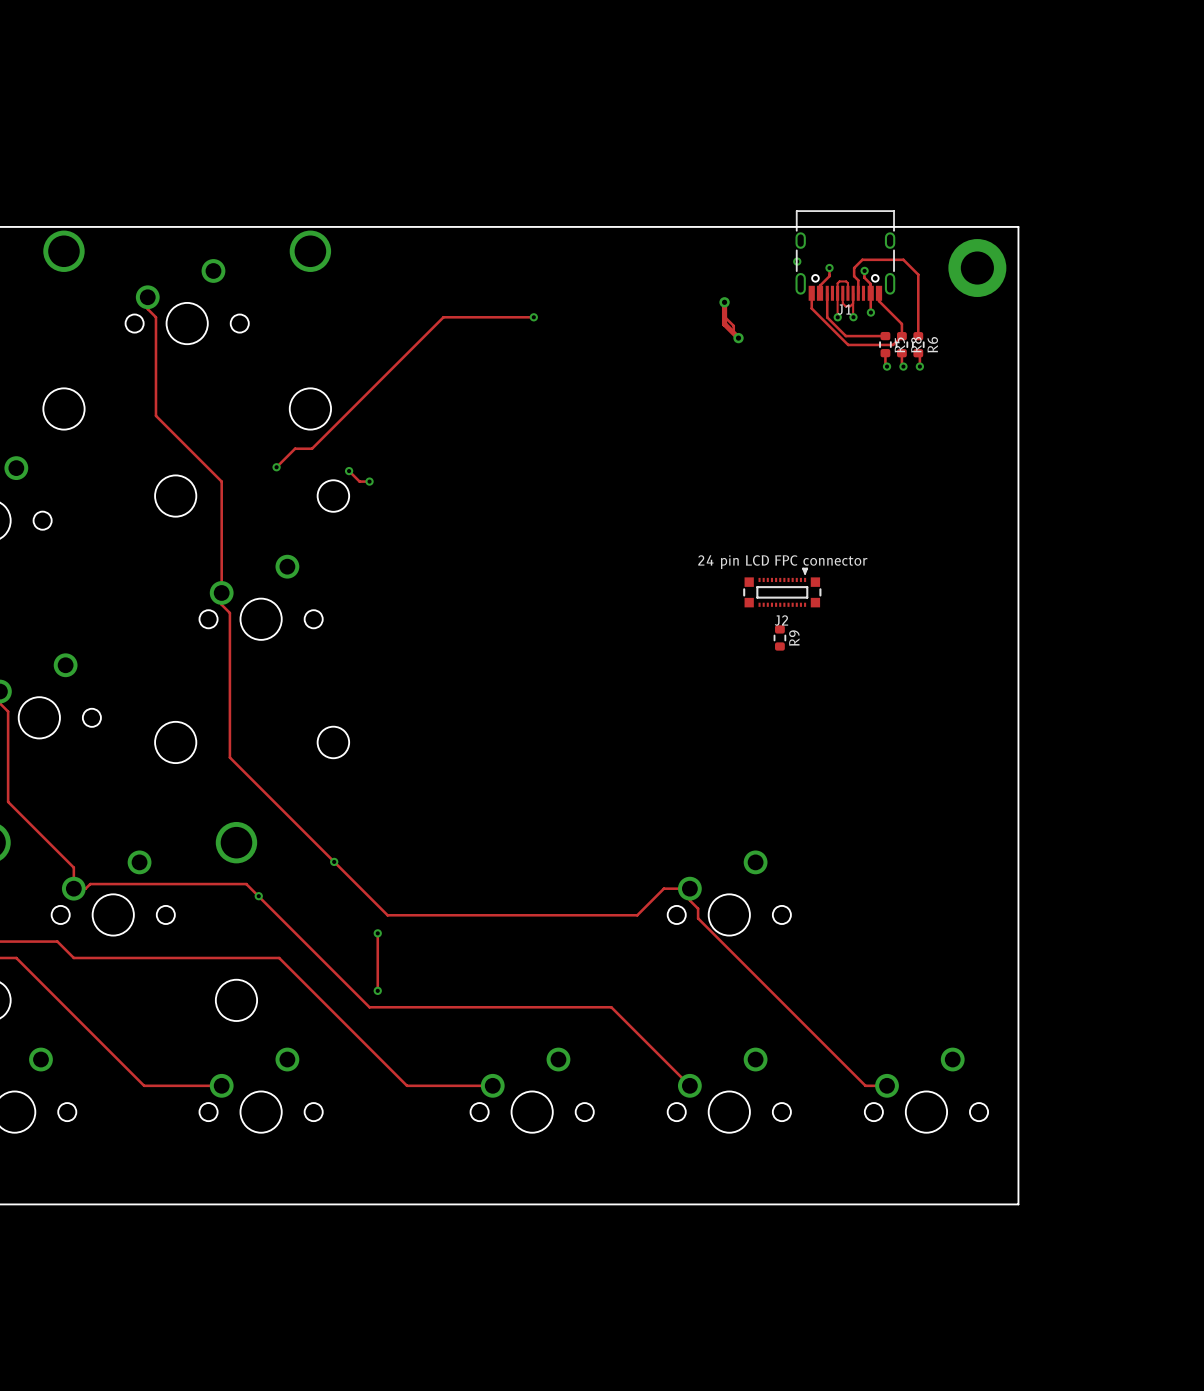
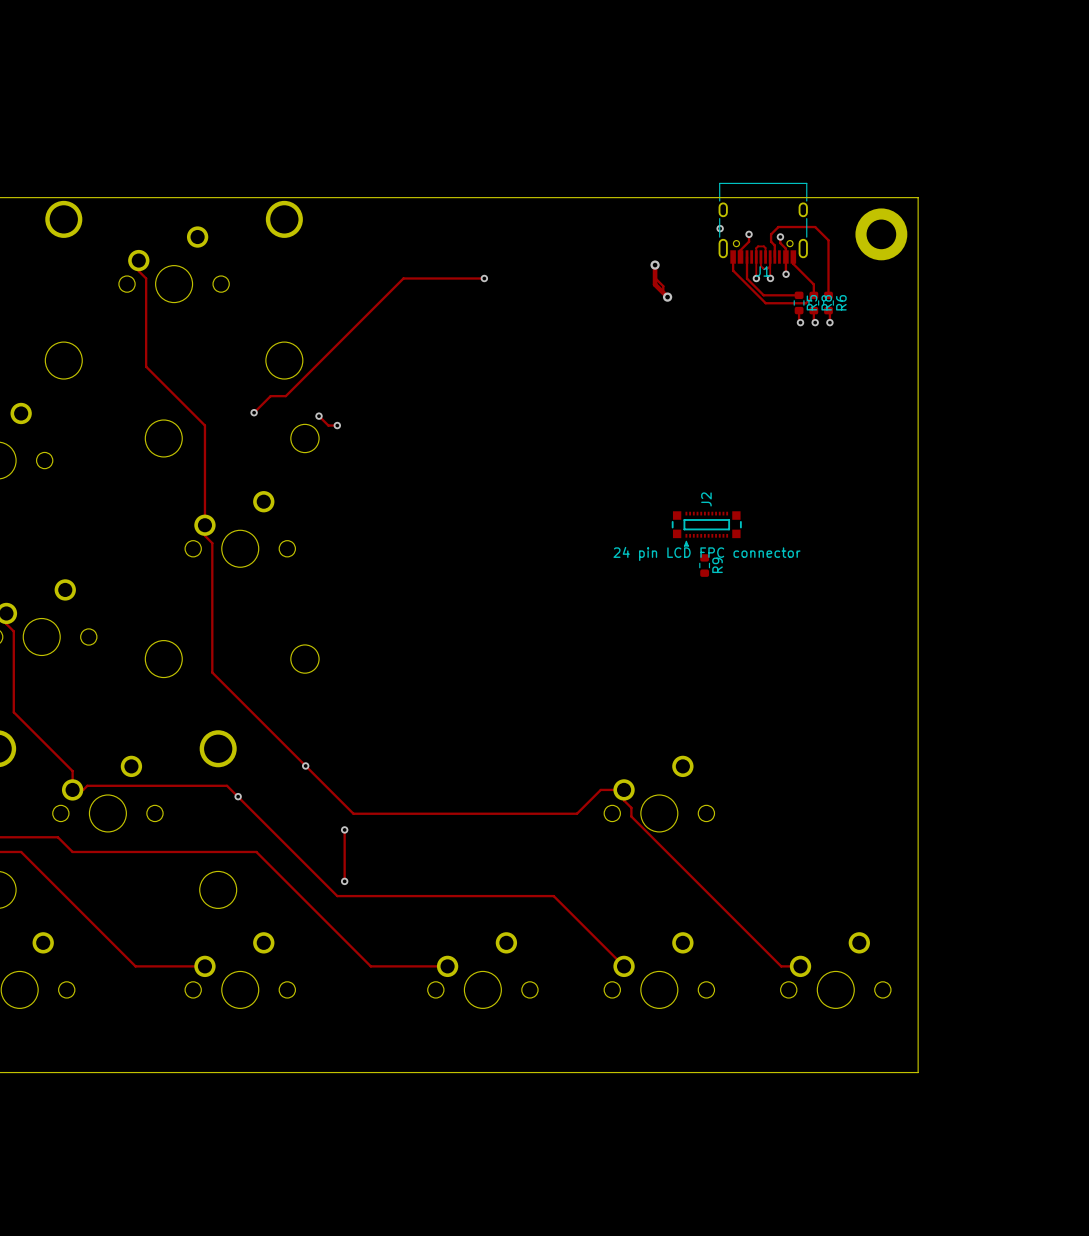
J2 rotation: 0° (782, 587) -> 180° (706, 528)

